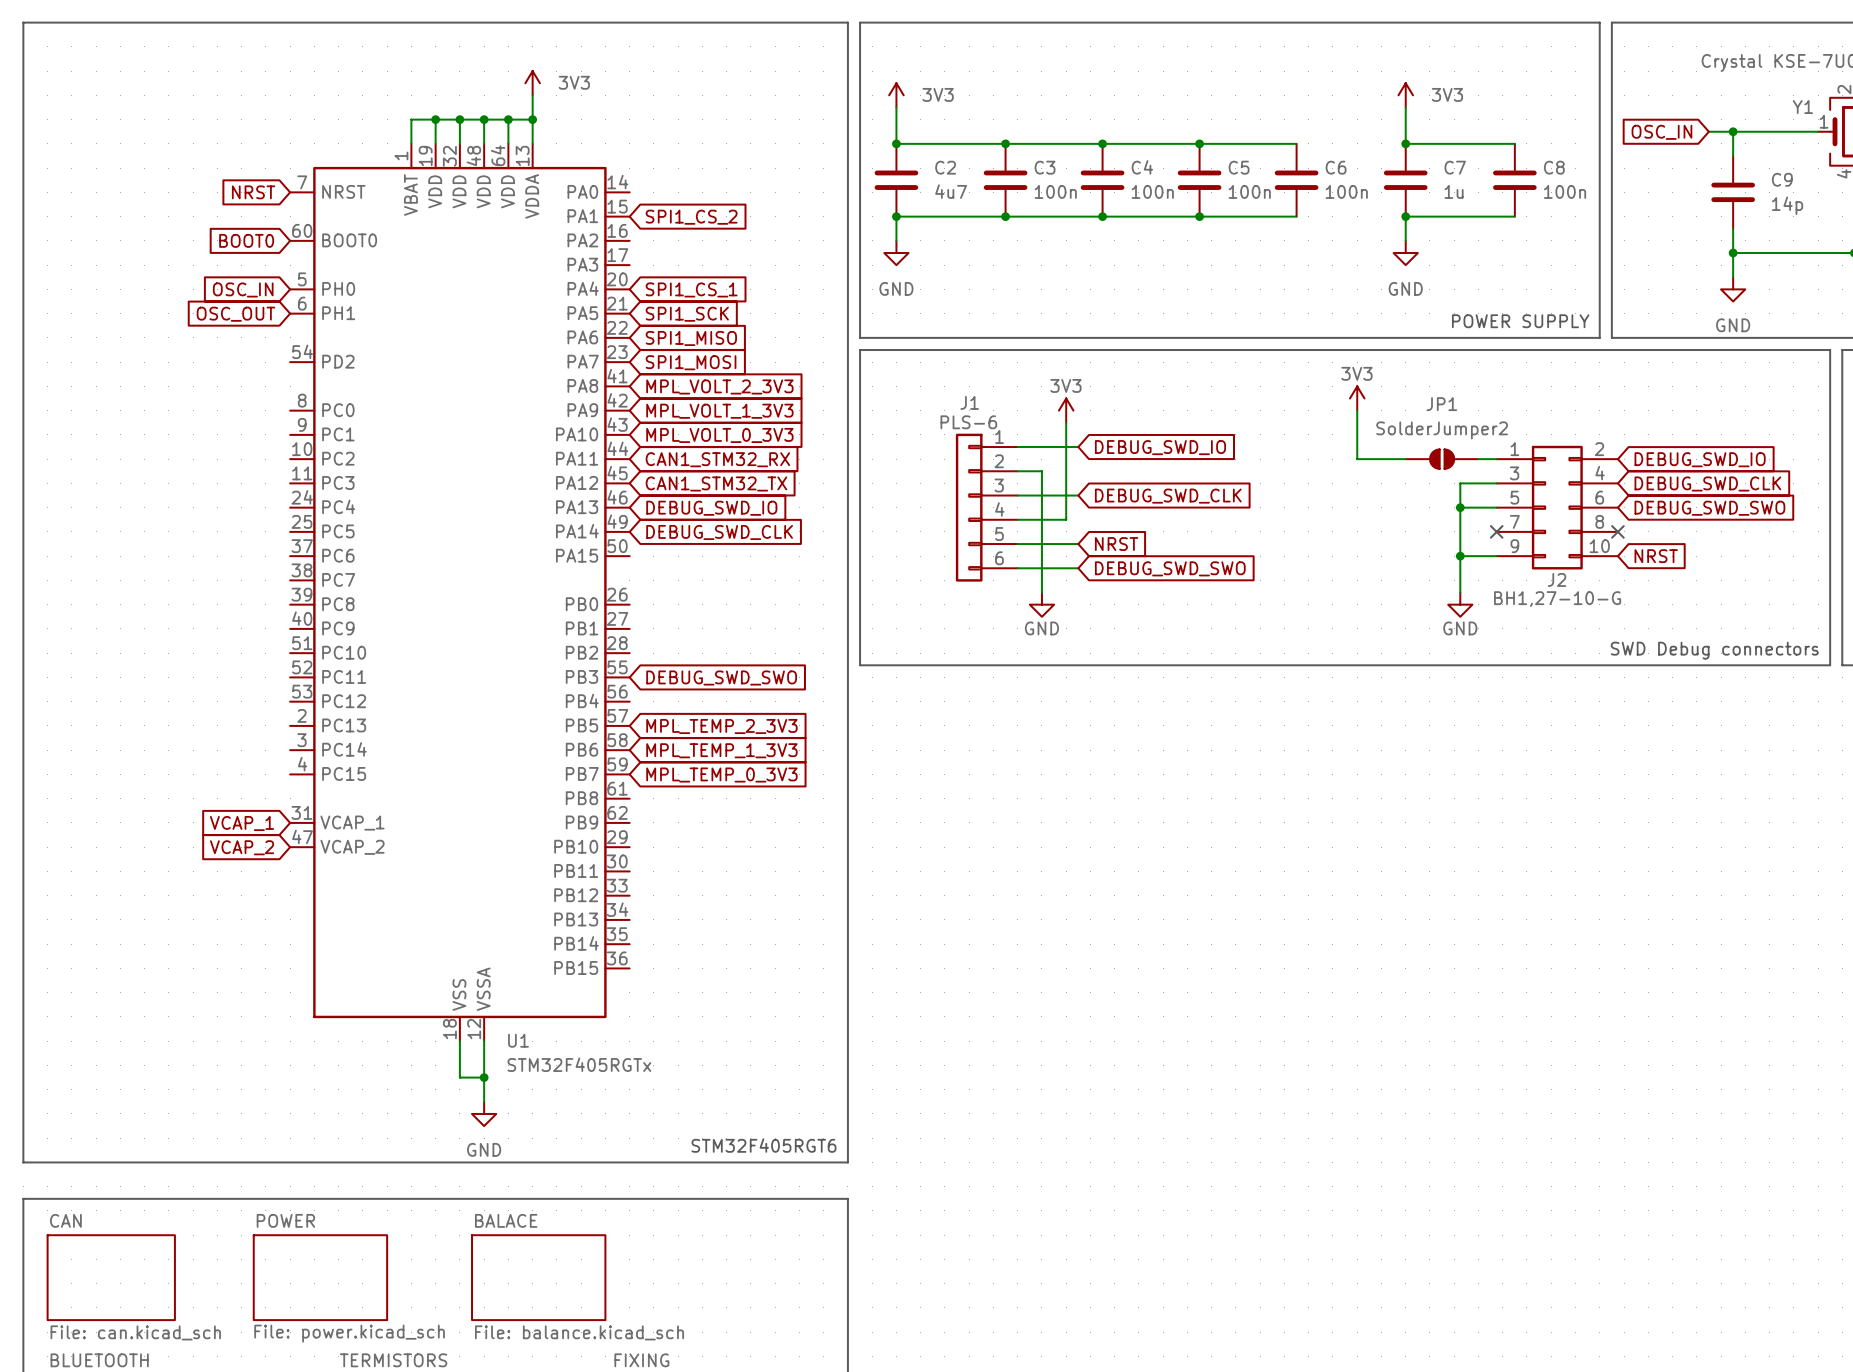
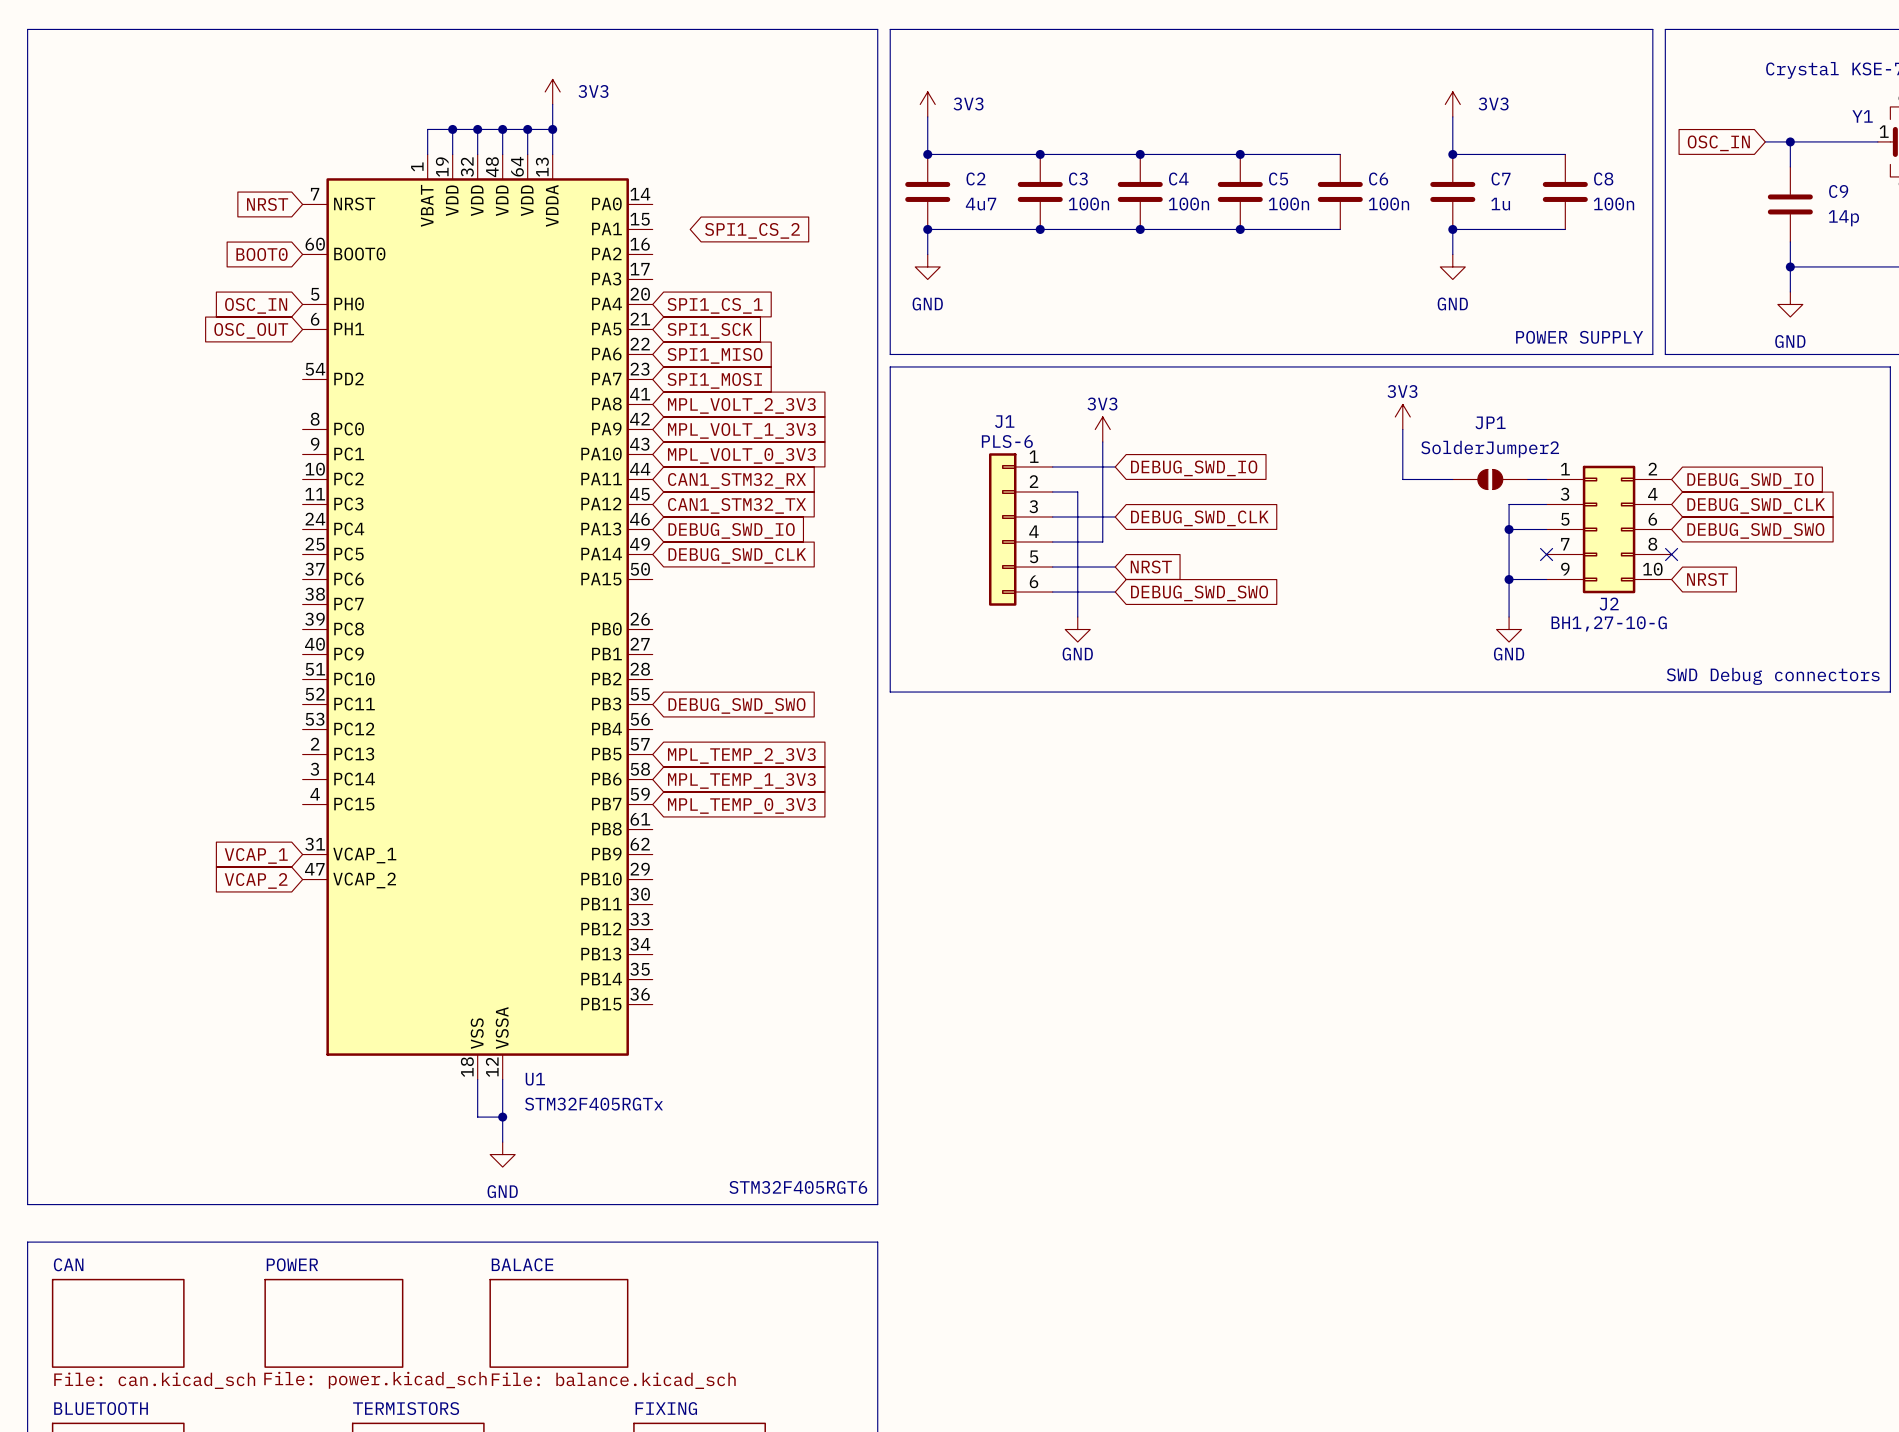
global label position: SPI1_CS_2 (691, 217) -> SPI1_CS_2 (752, 230)

